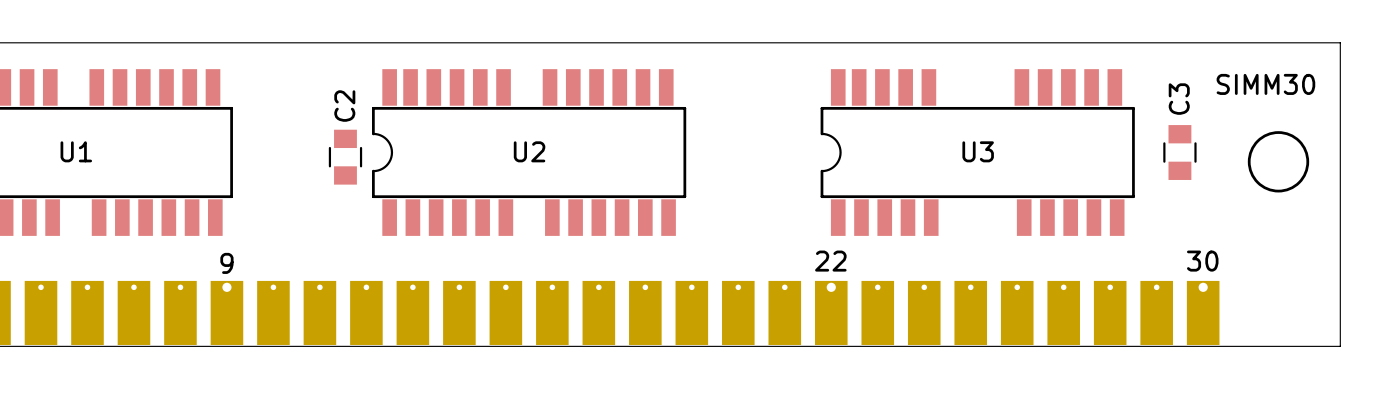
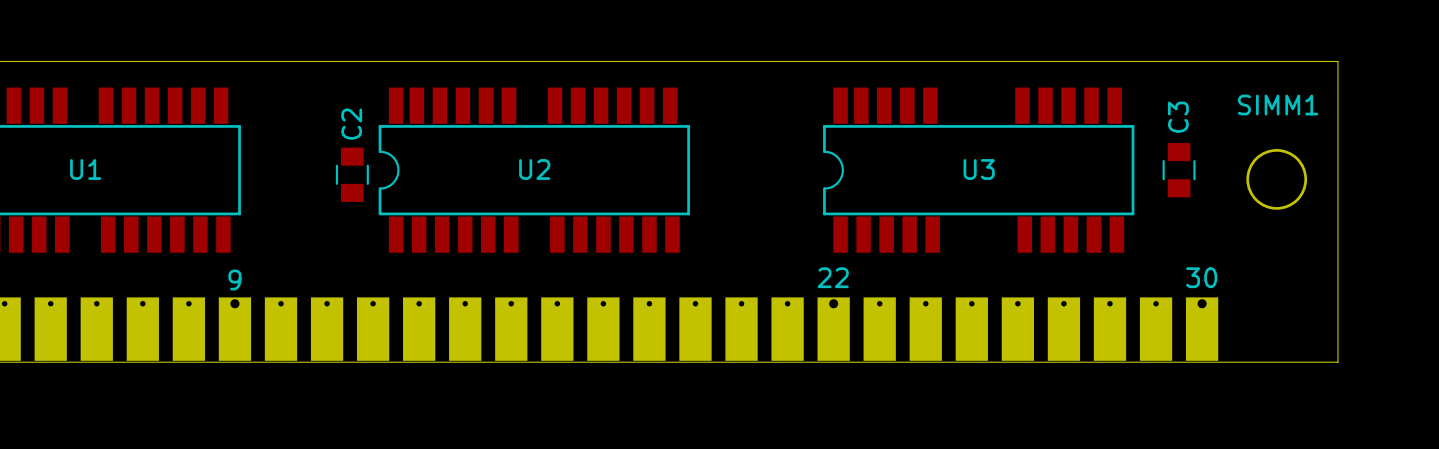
SIMM30 name: SIMM30 (1265, 84) -> SIMM1 (1278, 105)

